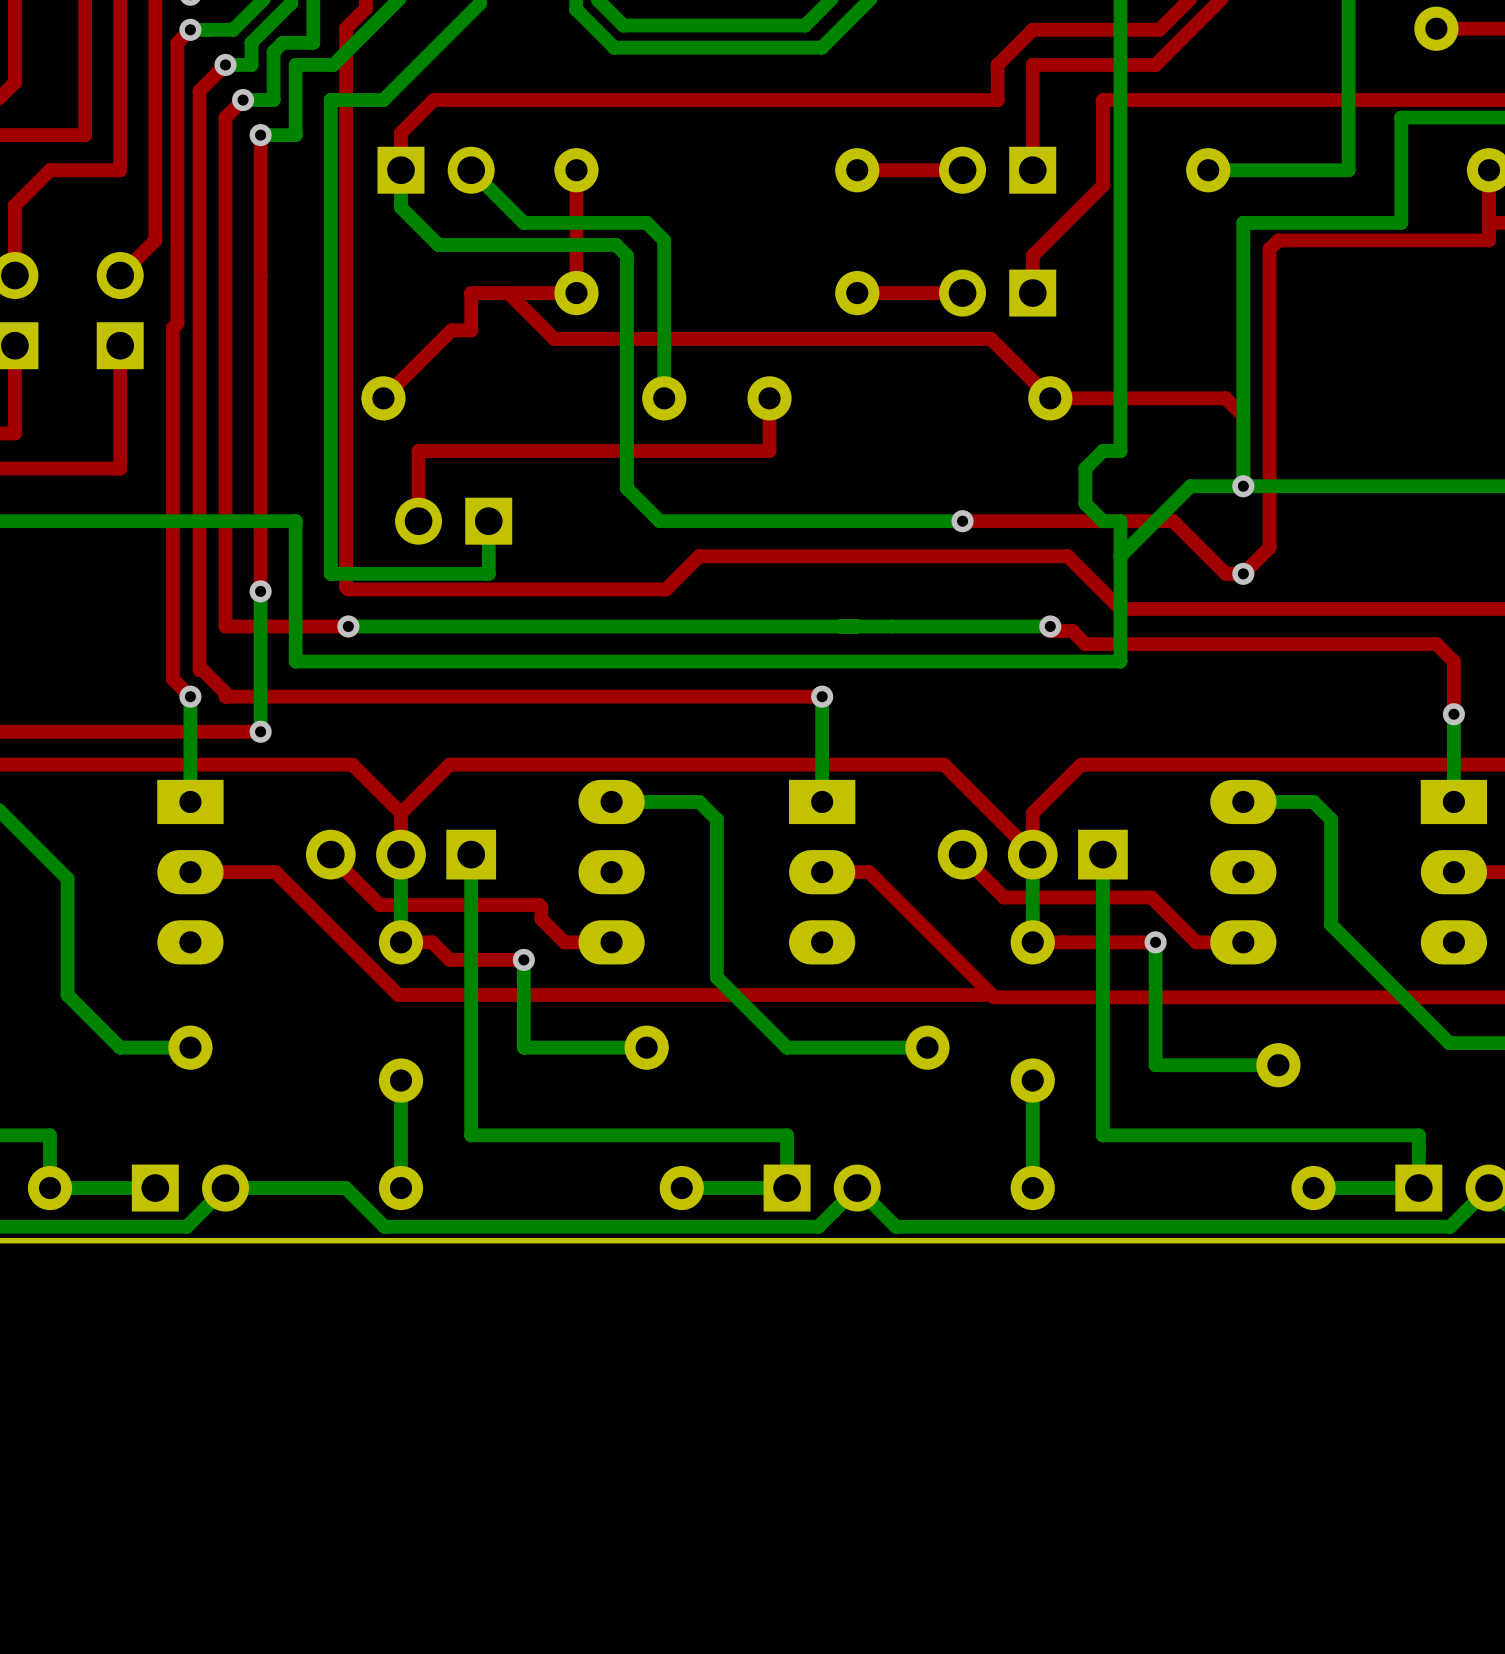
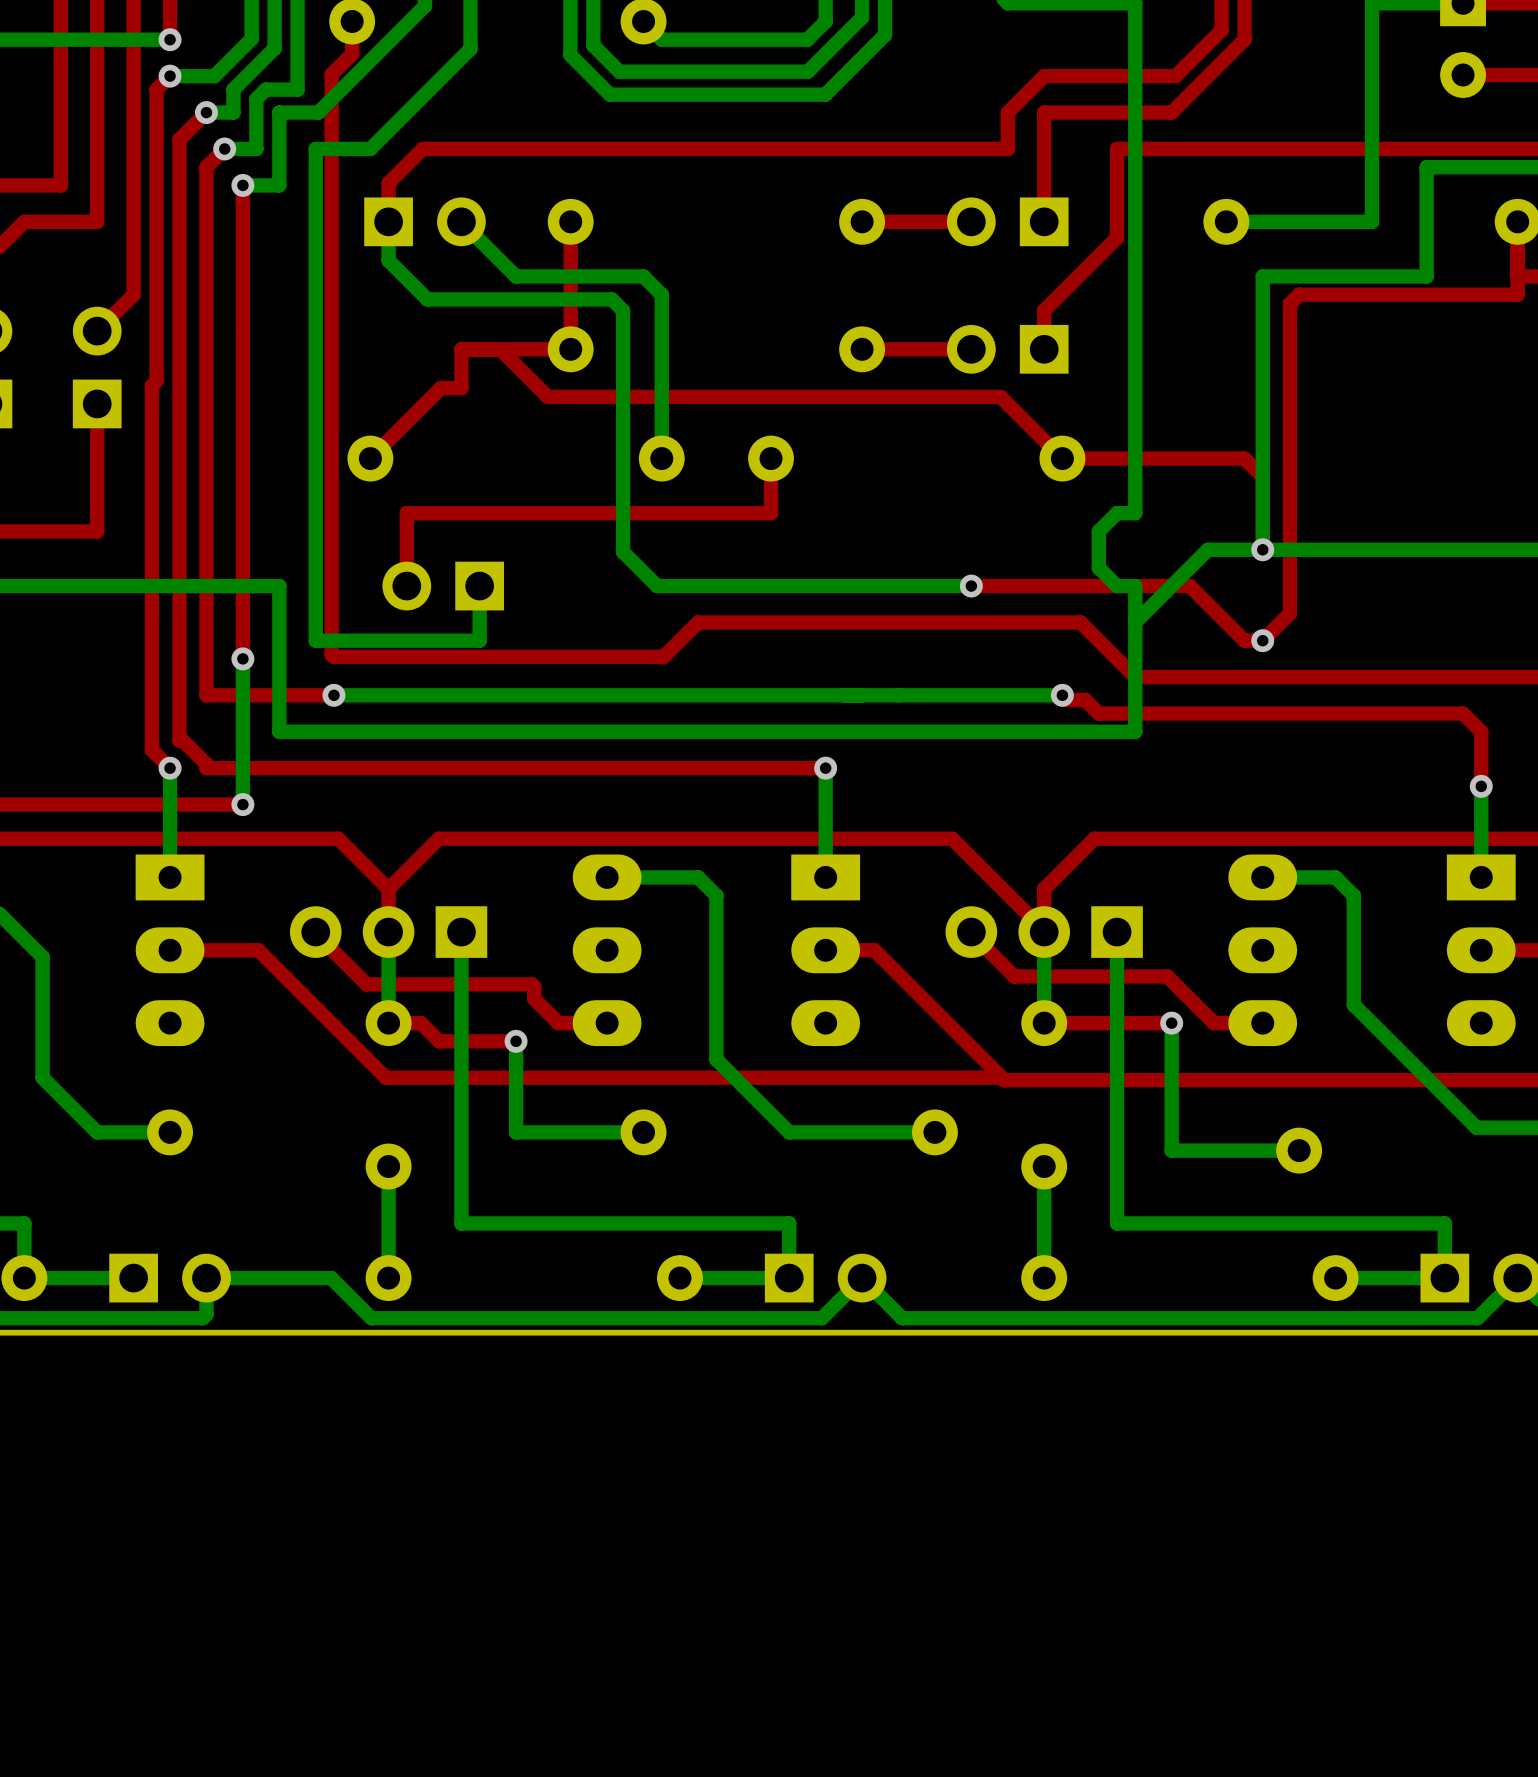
bottom track: (225, 1188) (186, 1226) -> (206, 1278) (206, 1314) (202, 1318) (166, 1318)

